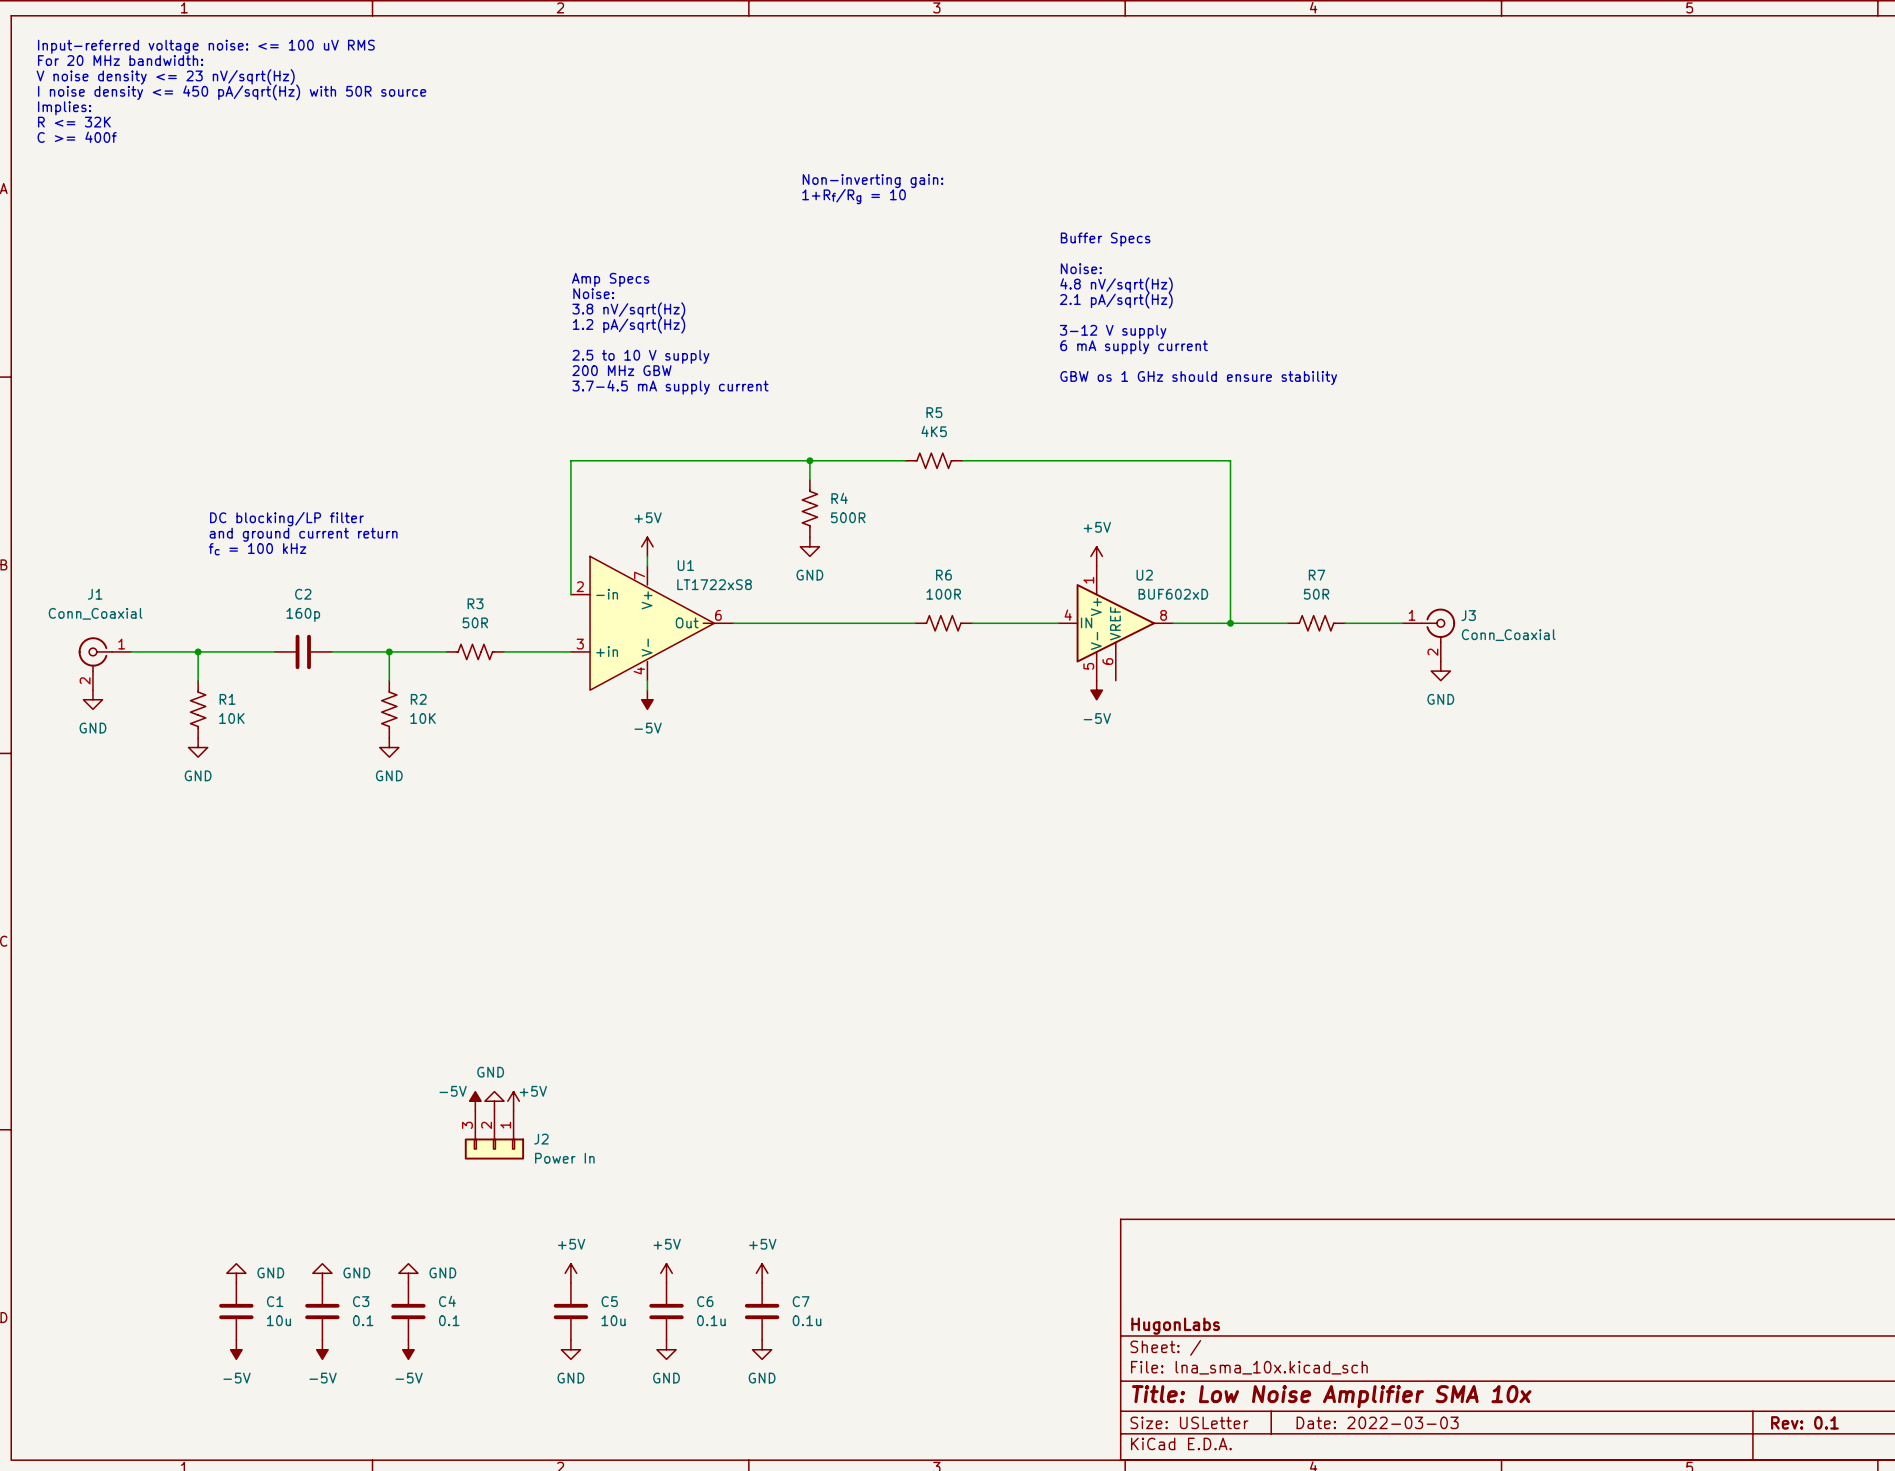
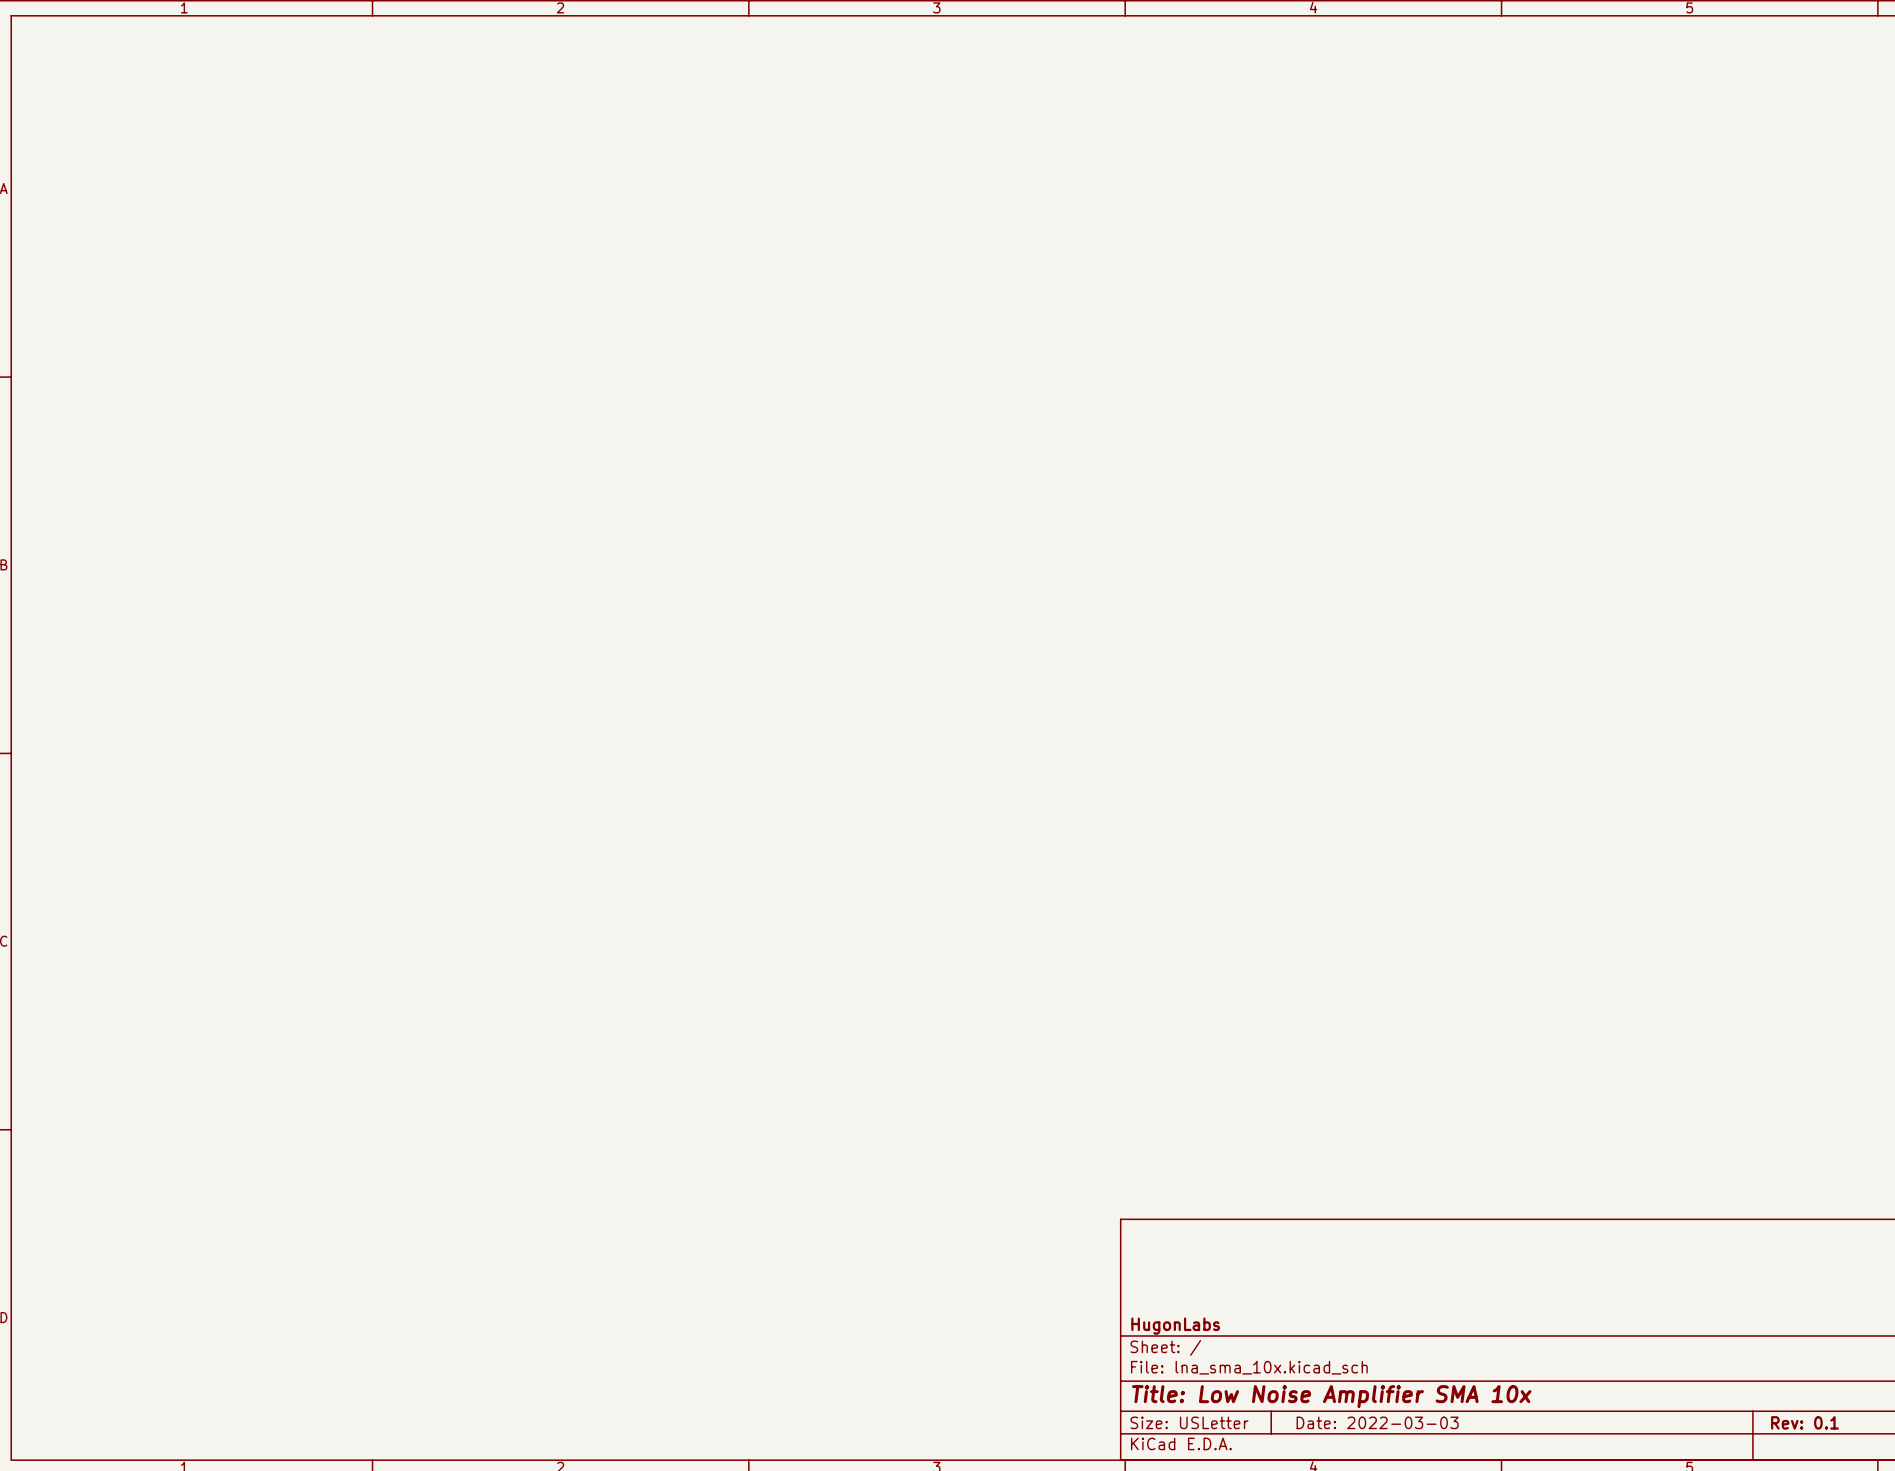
text: Input-referred voltage noise: <= 100 uV RMS (206, 46) -> none
text: For 20 MHz bandwidth: (120, 60) -> none
text: V noise density <= 23 nV/sqrt(Hz) (165, 77) -> none
text: I noise density <= 450 pA/sqrt(Hz) with 50R source (232, 92) -> none
text: Implies: (64, 108) -> none
text: R <= 32K (74, 122) -> none
text: C >= 400f (77, 137) -> none
text: Non-inverting gain: (873, 181) -> none
text: 1+Rf/Rg = 10 (854, 196) -> none
text: Buffer Specs (1105, 239) -> none
text: Noise: (1081, 268) -> none
text: Amp Specs (610, 279) -> none
text: 4.8 nV/sqrt(Hz) (1116, 285) -> none
text: Noise: (593, 293) -> none
text: 2.1 pA/sqrt(Hz) (1116, 300) -> none
text: 3.8 nV/sqrt(Hz) (628, 310) -> none
text: 1.2 pA/sqrt(Hz) (629, 325) -> none
text: 3-12 V supply (1113, 331) -> none
text: 6 mA supply current (1134, 347) -> none
text: 2.5 to 10 V supply (640, 356) -> none
text: 200 MHz GBW (621, 370) -> none
text: GBW os 1 GHz should ensure stability (1198, 378) -> none
text: 3.7-4.5 mA supply current (670, 387) -> none
wire: (809, 460) (809, 479) -> none
junction: (809, 460) -> none
wire: (905, 460) (570, 460) (570, 594) -> none
R5: 4K5 (934, 460) -> none
wire: (962, 460) (1230, 460) (1230, 623) -> none
R4: 500R (809, 508) -> none
text: DC blocking/LP filter (286, 519) -> none
text: and ground current return (303, 534) -> none
power symbol: +5V (647, 546) -> none
power symbol: GND (809, 546) -> none
text: fc = 100 kHz (257, 549) -> none
wire: (647, 556) (647, 565) -> none
power symbol: +5V (1096, 556) -> none
U1: LT1722xS8 (652, 623) -> none
wire: (733, 623) (915, 623) -> none
R6: 100R (943, 623) -> none
wire: (972, 623) (1058, 623) -> none
U2: BUF602xD (1115, 623) -> none
wire: (1173, 623) (1287, 623) -> none
junction: (1230, 623) -> none
R7: 50R (1316, 623) -> none
wire: (1345, 623) (1402, 623) -> none
J3: Conn_Coaxial (1428, 635) -> none
wire: (131, 651) (274, 651) -> none
wire: (198, 651) (198, 680) -> none
junction: (198, 651) -> none
C2: 160p (303, 651) -> none
wire: (331, 651) (446, 651) -> none
wire: (389, 651) (389, 680) -> none
junction: (389, 651) -> none
R3: 50R (475, 651) -> none
wire: (504, 651) (570, 651) -> none
J1: Conn_Coaxial (104, 663) -> none
power symbol: GND (1440, 671) -> none
wire: (647, 680) (647, 690) -> none
power symbol: -5V (1096, 690) -> none
power symbol: GND (92, 699) -> none
power symbol: -5V (647, 699) -> none
R1: 10K (198, 709) -> none
R2: 10K (389, 709) -> none
power symbol: GND (198, 747) -> none
power symbol: GND (389, 747) -> none
power symbol: -5V (475, 1101) -> none
power symbol: GND (494, 1101) -> none
power symbol: +5V (513, 1101) -> none
J2: Power In (494, 1135) -> none
power symbol: GND (236, 1273) -> none
power symbol: GND (322, 1273) -> none
power symbol: GND (408, 1273) -> none
power symbol: +5V (570, 1273) -> none
power symbol: +5V (666, 1273) -> none
power symbol: +5V (762, 1273) -> none
C1: 10u (236, 1311) -> none
C3: 0.1 (322, 1311) -> none
C4: 0.1 (408, 1311) -> none
C5: 10u (570, 1311) -> none
C6: 0.1u (666, 1311) -> none
C7: 0.1u (762, 1311) -> none
power symbol: -5V (236, 1349) -> none
power symbol: -5V (322, 1349) -> none
power symbol: -5V (408, 1349) -> none
power symbol: GND (570, 1349) -> none
power symbol: GND (666, 1349) -> none
power symbol: GND (762, 1349) -> none

